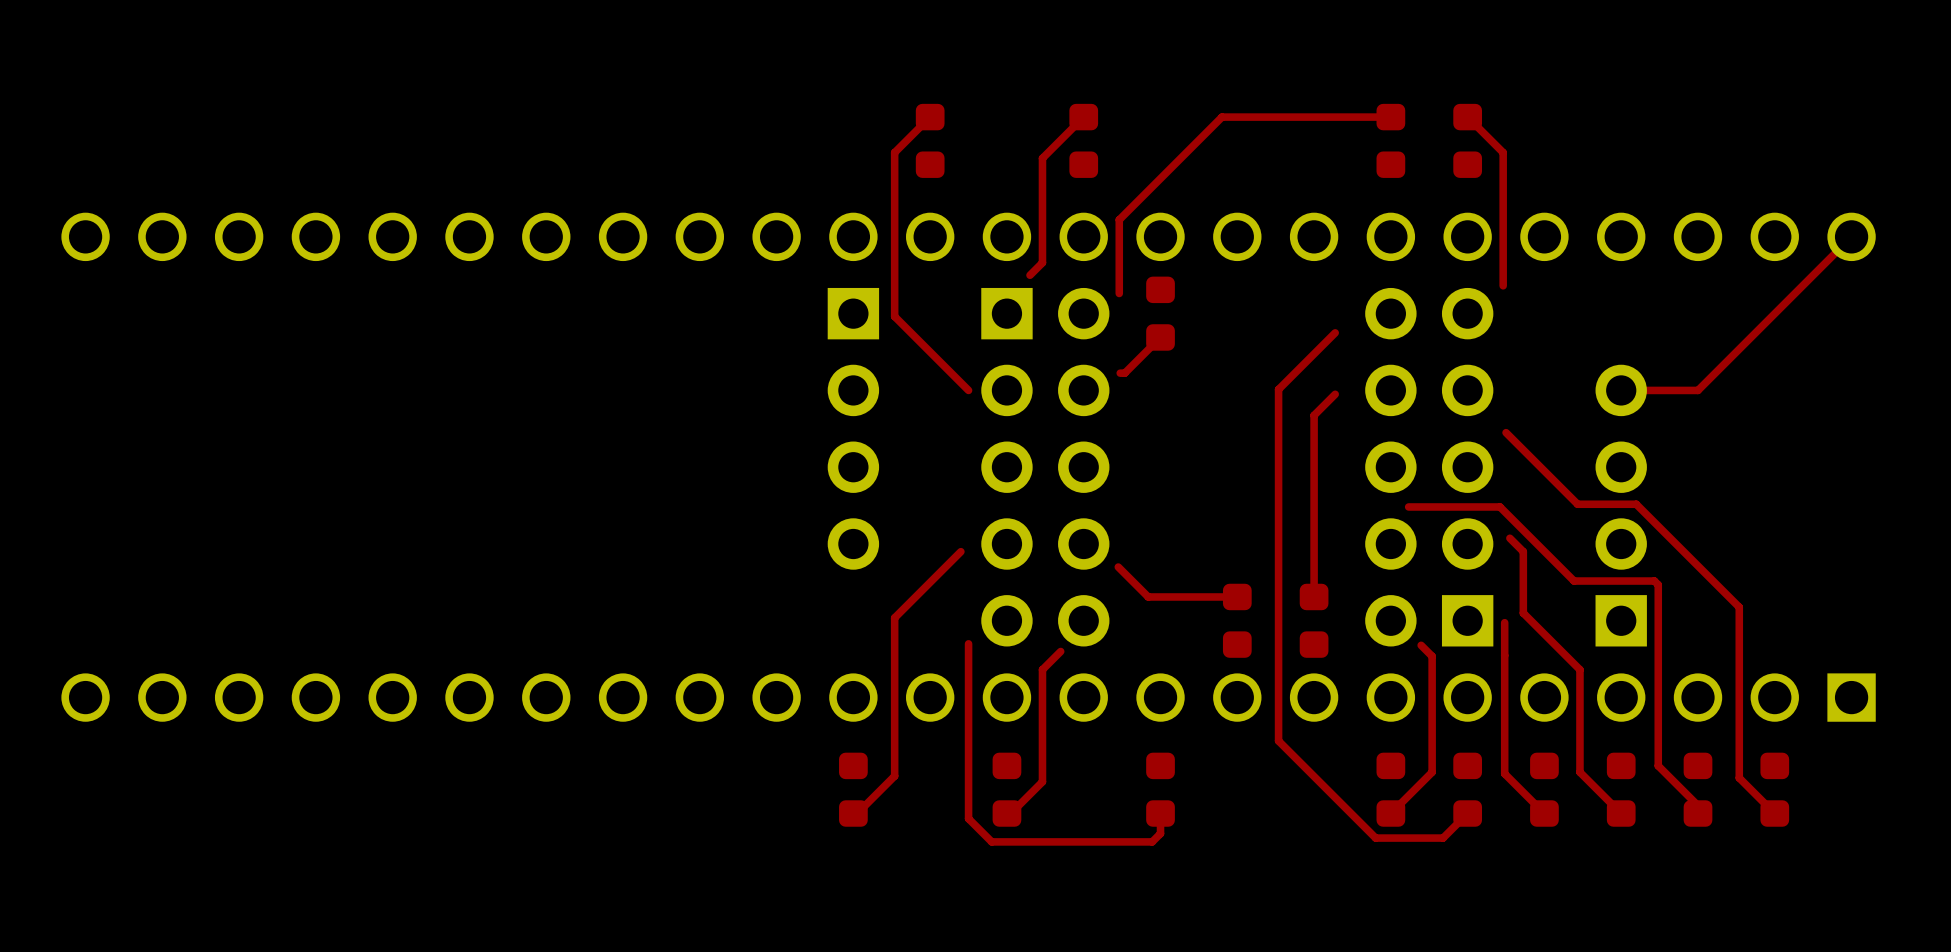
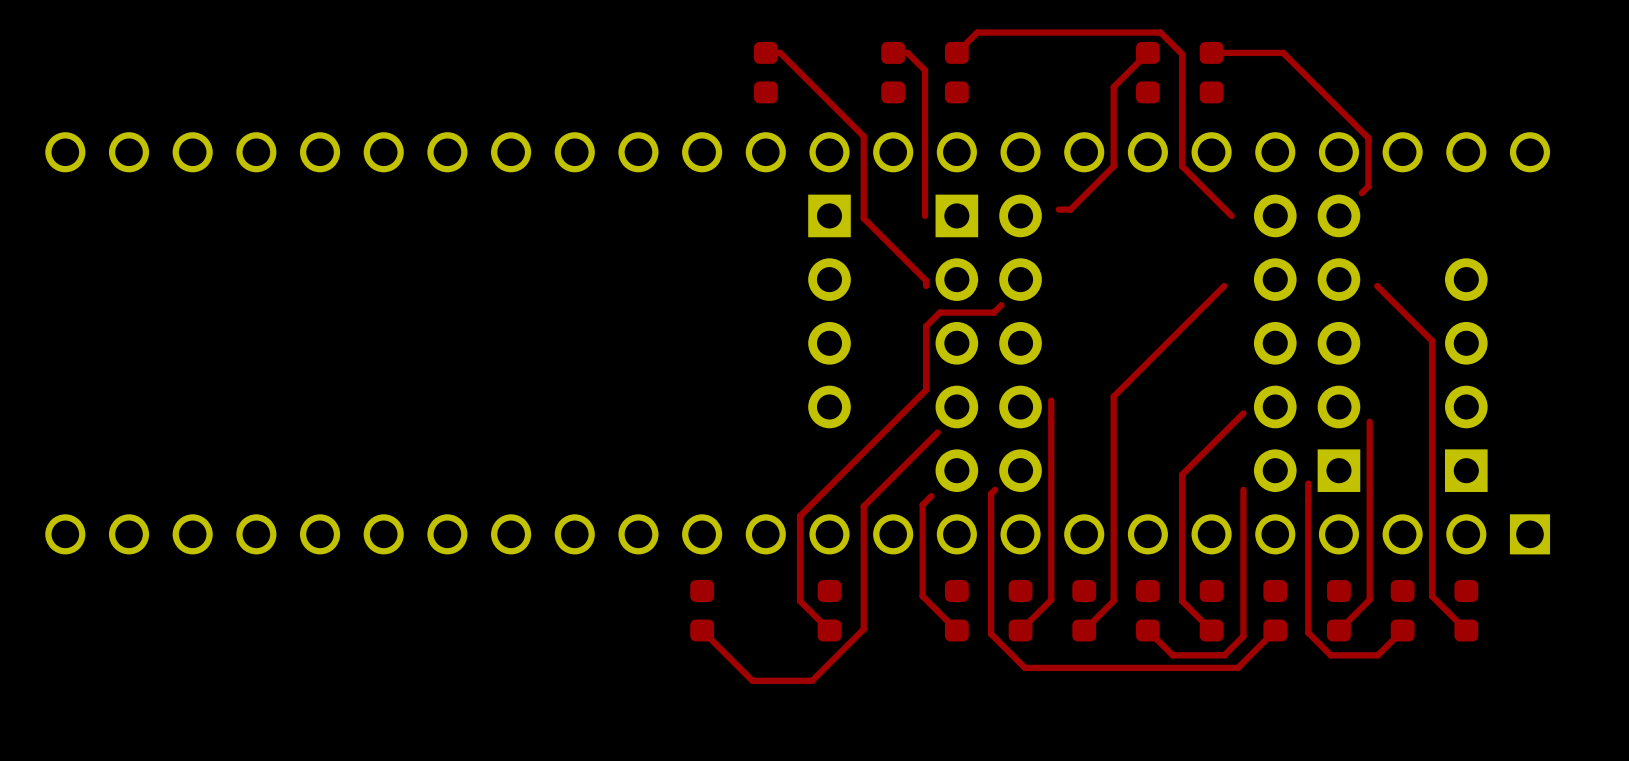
top track: (930, 117) (894, 152) (894, 316) (968, 390) -> (765, 52) (780, 52) (863, 136) (863, 218) (926, 280) (926, 285)
top track: (1083, 117) (1042, 158) (1042, 262) (1029, 275) -> (893, 52) (907, 52) (925, 70) (925, 215)
top track: none -> (956, 52) (977, 32) (1160, 32) (1182, 54) (1182, 166) (1231, 215)
top track: (1390, 117) (1222, 117) (1119, 219) (1119, 293) -> (1147, 52) (1113, 87) (1113, 166) (1070, 209) (1058, 209)
top track: (1467, 117) (1503, 152) (1503, 285) -> (1211, 52) (1283, 52) (1368, 138) (1368, 186) (1361, 193)
top track: (1851, 236) (1698, 390) (1621, 390) -> none
part position: (1160, 313) -> (956, 72)
top track: (1335, 332) (1278, 389) (1278, 740) (1375, 838) (1443, 838) (1467, 813) -> none
top track: (1160, 337) (1124, 373) (1120, 373) -> none
top track: (1335, 394) (1314, 415) (1314, 596) -> none
top track: none -> (1224, 285) (1113, 396) (1113, 601) (1084, 630)
top track: none -> (1001, 305) (993, 312) (939, 312) (926, 326) (926, 389) (800, 516) (800, 601) (829, 630)
part position: (853, 428) -> (829, 311)
top track: (1506, 432) (1577, 504) (1636, 504) (1739, 607) (1739, 777) -> (1377, 285) (1432, 340) (1432, 596) (1436, 601)
part: (1045, 467) -> none
part: none -> (988, 343)
part: (1429, 467) -> none
part: none -> (1307, 343)
part position: (1621, 505) -> (1466, 375)
top track: (1408, 506) (1499, 506) (1574, 581) (1654, 581) (1658, 584) -> (1369, 421) (1369, 440)
top track: none -> (1051, 400) (1051, 599) (1020, 630)
top track: (1509, 538) (1523, 551) (1523, 613) (1579, 669) (1579, 772) (1621, 813) -> none
top track: (960, 551) (894, 617) (894, 776) (853, 817) -> none
top track: (1118, 567) (1148, 596) (1237, 596) -> none
top track: none -> (937, 432) (874, 496)
part: (1237, 620) -> none
part: (1314, 620) -> none
top track: (1504, 622) (1504, 773) (1544, 813) -> (995, 489) (991, 493) (991, 634) (1024, 667) (1237, 667) (1275, 630)
top track: none -> (1308, 483) (1308, 632) (1330, 655) (1377, 655) (1402, 630)
top track: (968, 643) (968, 818) (991, 841) (1152, 841) (1160, 833) (1160, 817) -> none
top track: none -> (1243, 489) (1243, 636) (1224, 655) (1172, 655) (1147, 630)
top track: (1421, 645) (1432, 656) -> (1243, 413) (1182, 474) (1182, 500)
top track: none -> (931, 496) (922, 504) (922, 596) (956, 630)
top track: (1048, 663) (1042, 669) (1042, 781) (1006, 817) -> (863, 506) (863, 629) (812, 680) (752, 680) (702, 630)
top track: (1658, 765) (1698, 805) (1698, 813) -> (1369, 591) (1369, 599) (1338, 630)
top track: (1432, 772) (1390, 813) -> (1182, 596) (1182, 601) (1211, 630)
part: none -> (1020, 610)
part: none -> (1084, 610)

